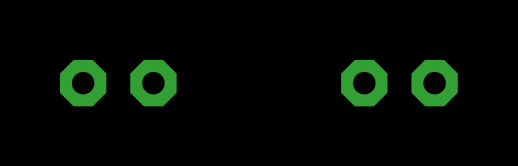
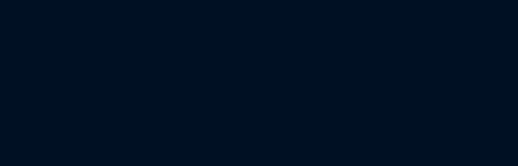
part: (118, 83) -> none
part: (399, 83) -> none

